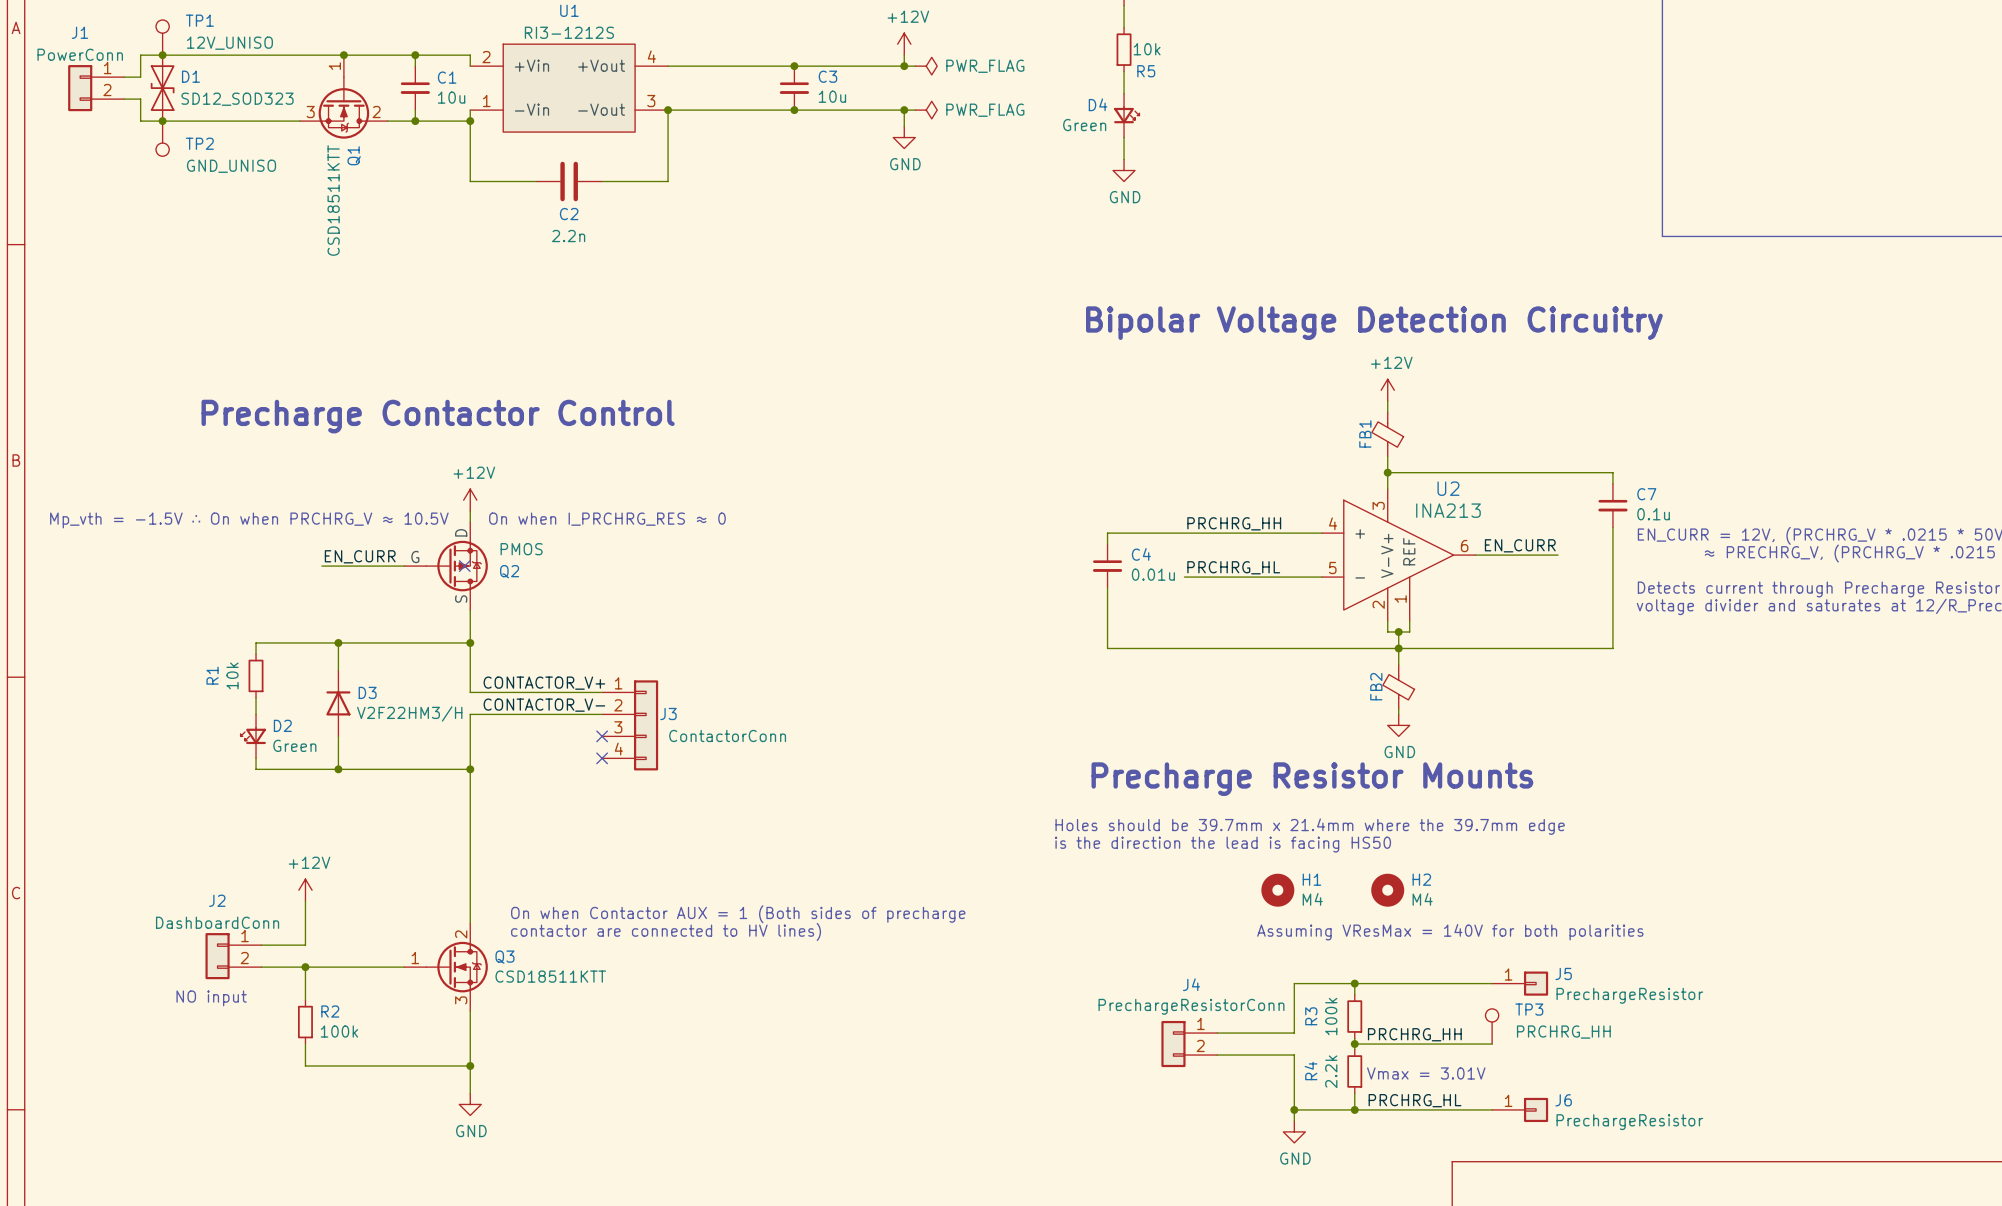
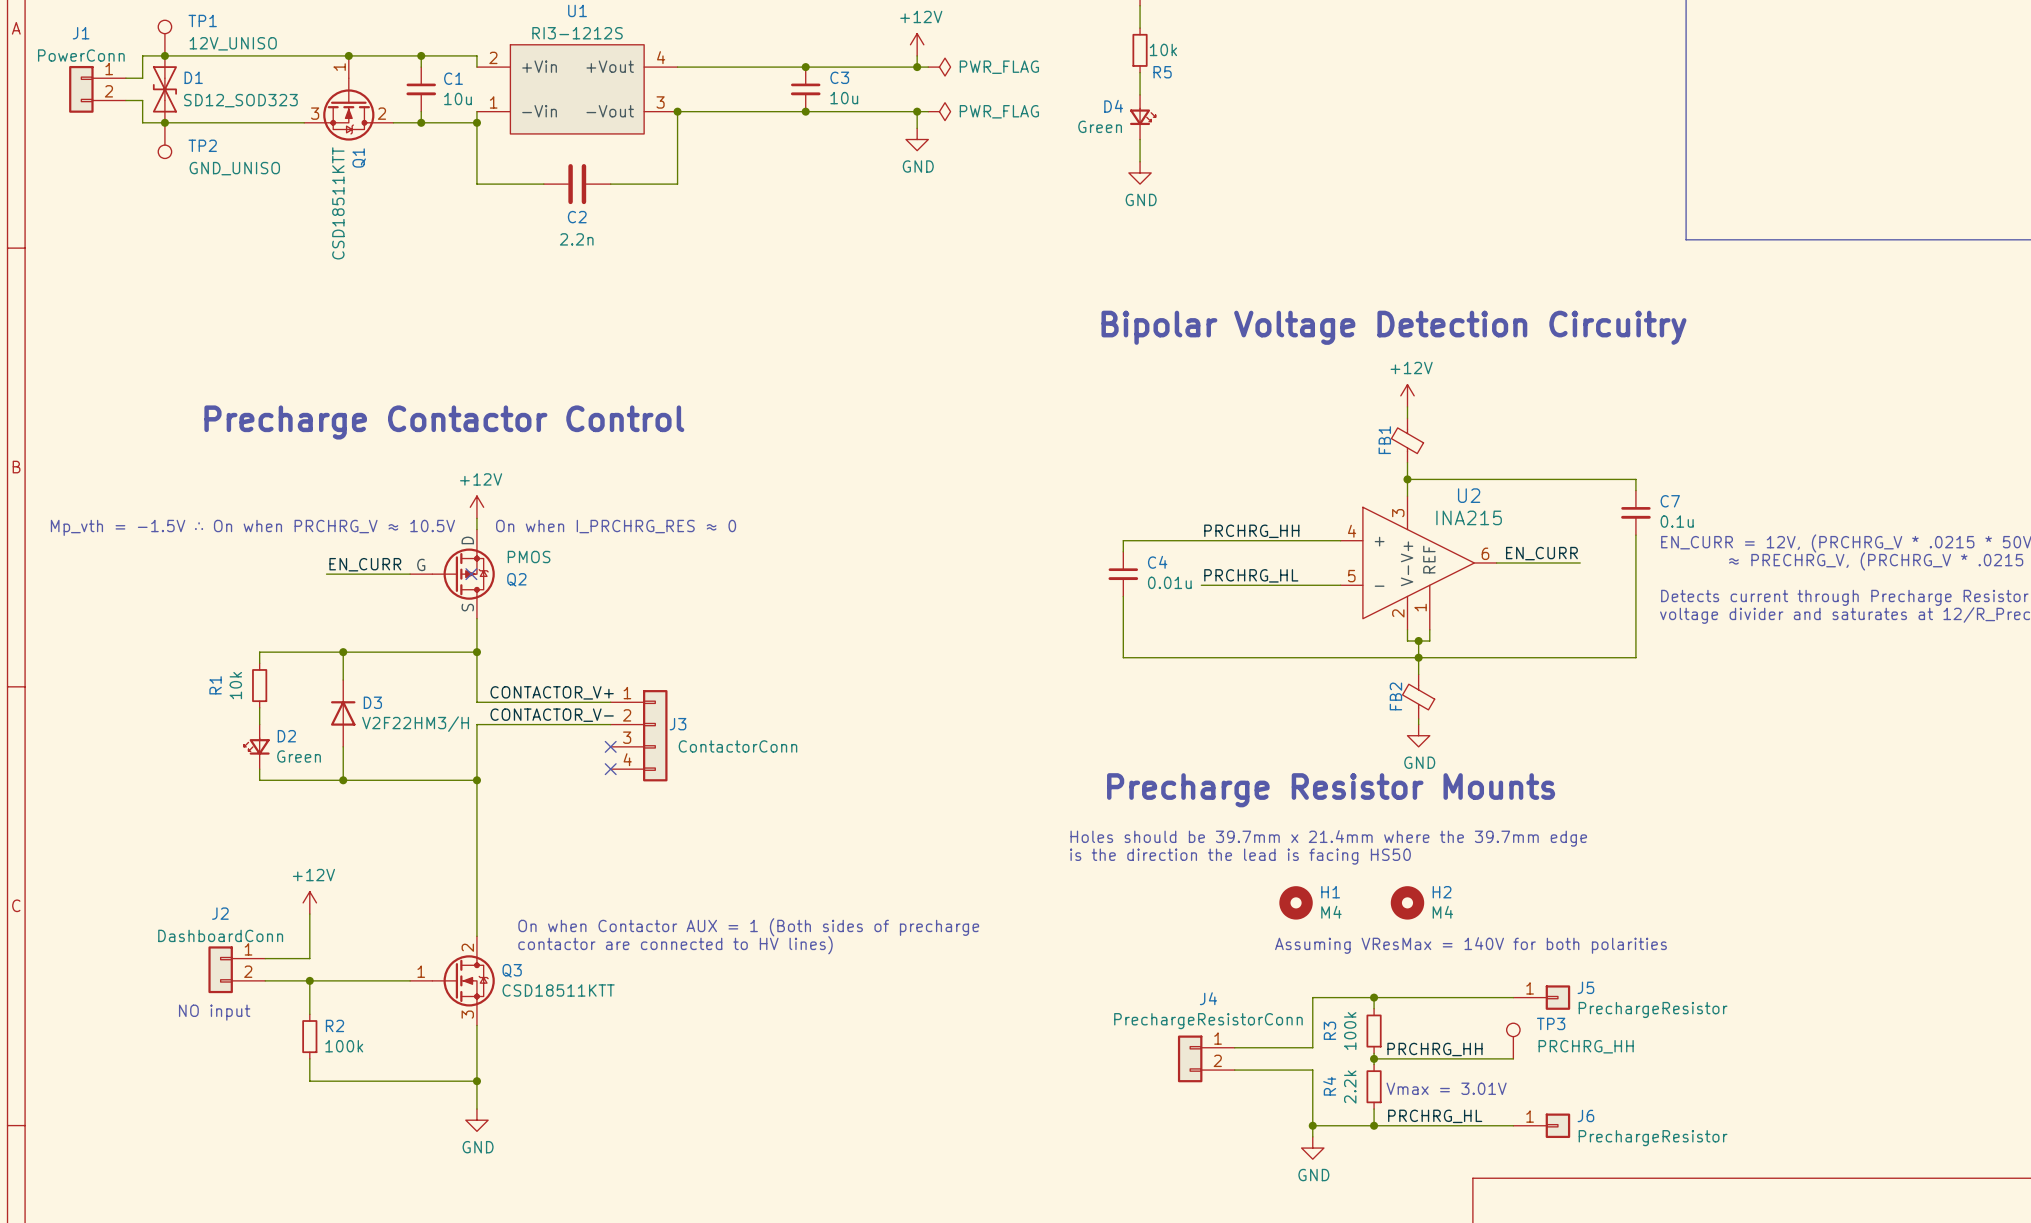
U2 value: INA213 (1448, 510) -> INA215 (1469, 517)

